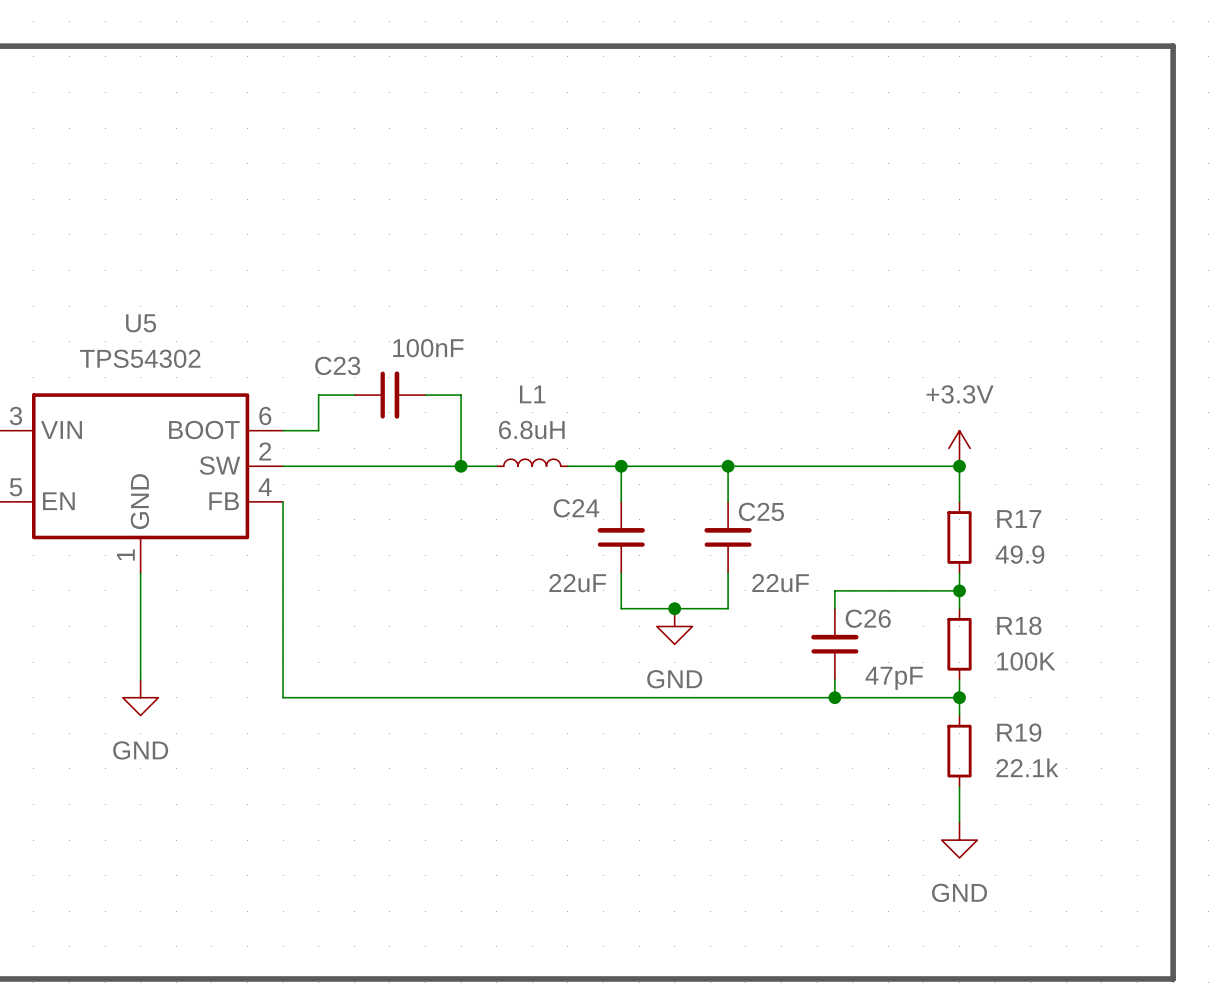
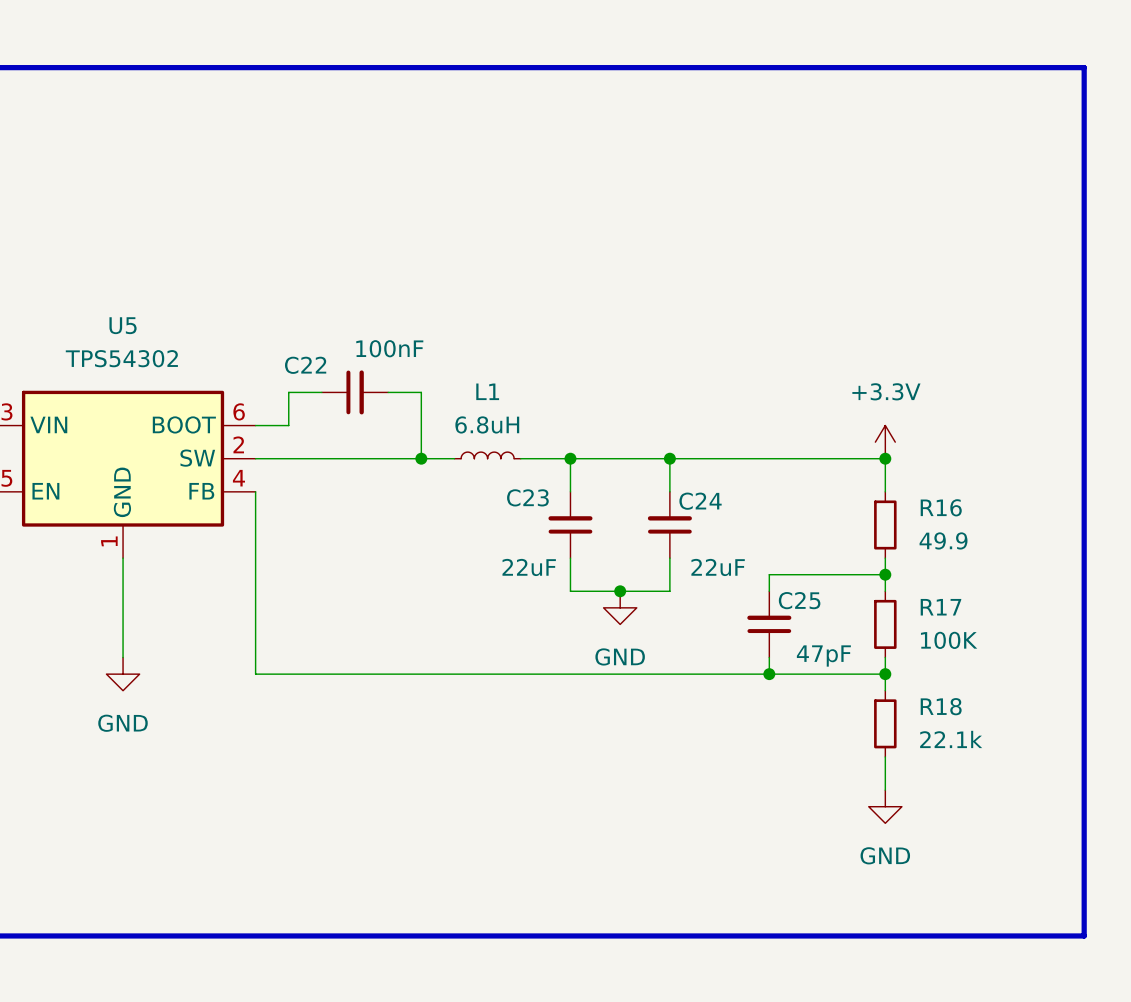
C23 name: C23 (337, 365) -> C22 (305, 365)
C24 name: C24 (576, 508) -> C23 (527, 497)
C25 name: C25 (761, 511) -> C24 (700, 501)
R17 name: R17 (1019, 519) -> R16 (941, 507)
C26 name: C26 (868, 618) -> C25 (799, 600)
R18 name: R18 (1019, 625) -> R17 (940, 607)
R19 name: R19 (1019, 732) -> R18 (941, 706)

